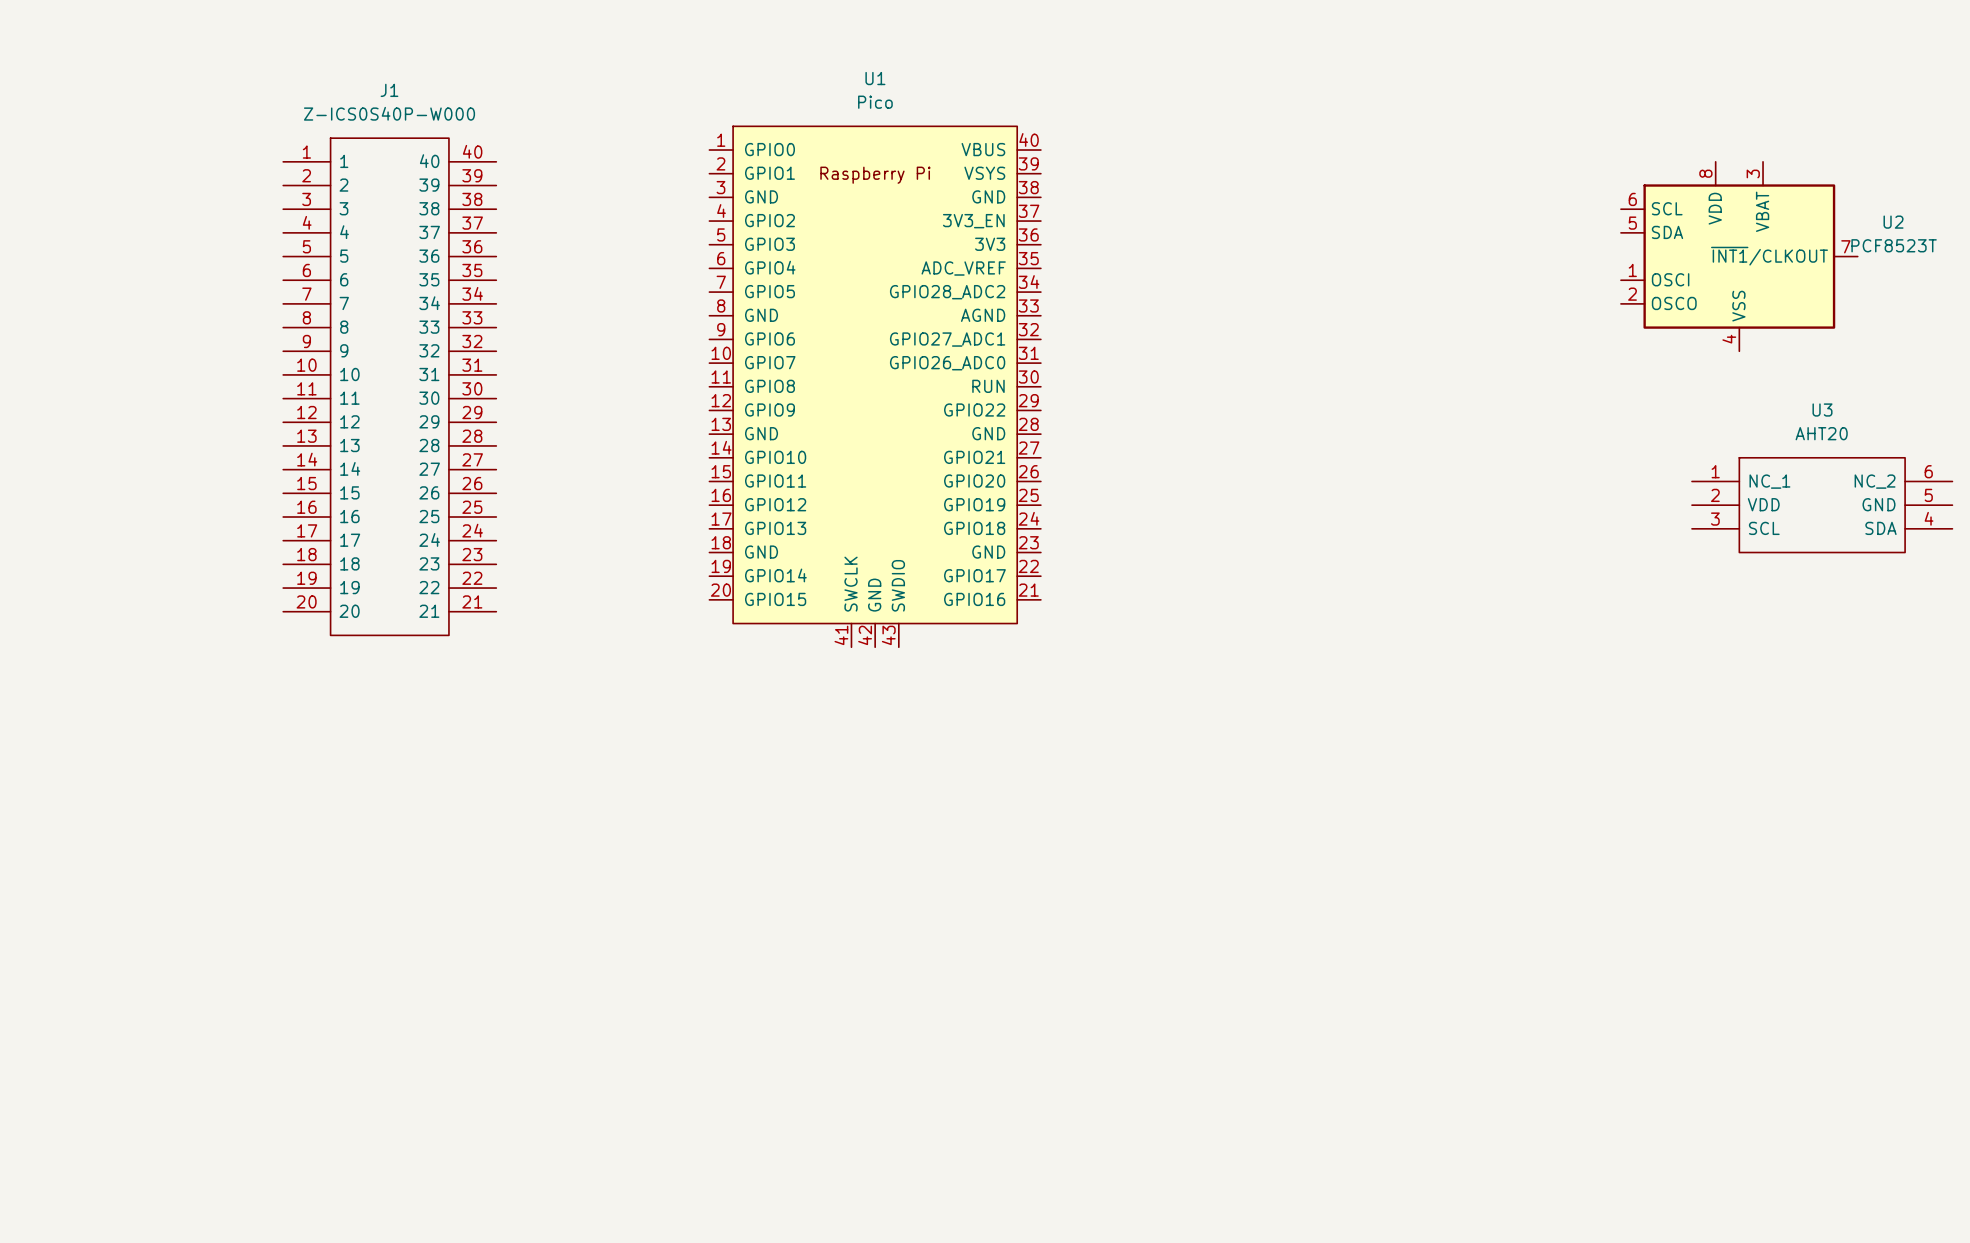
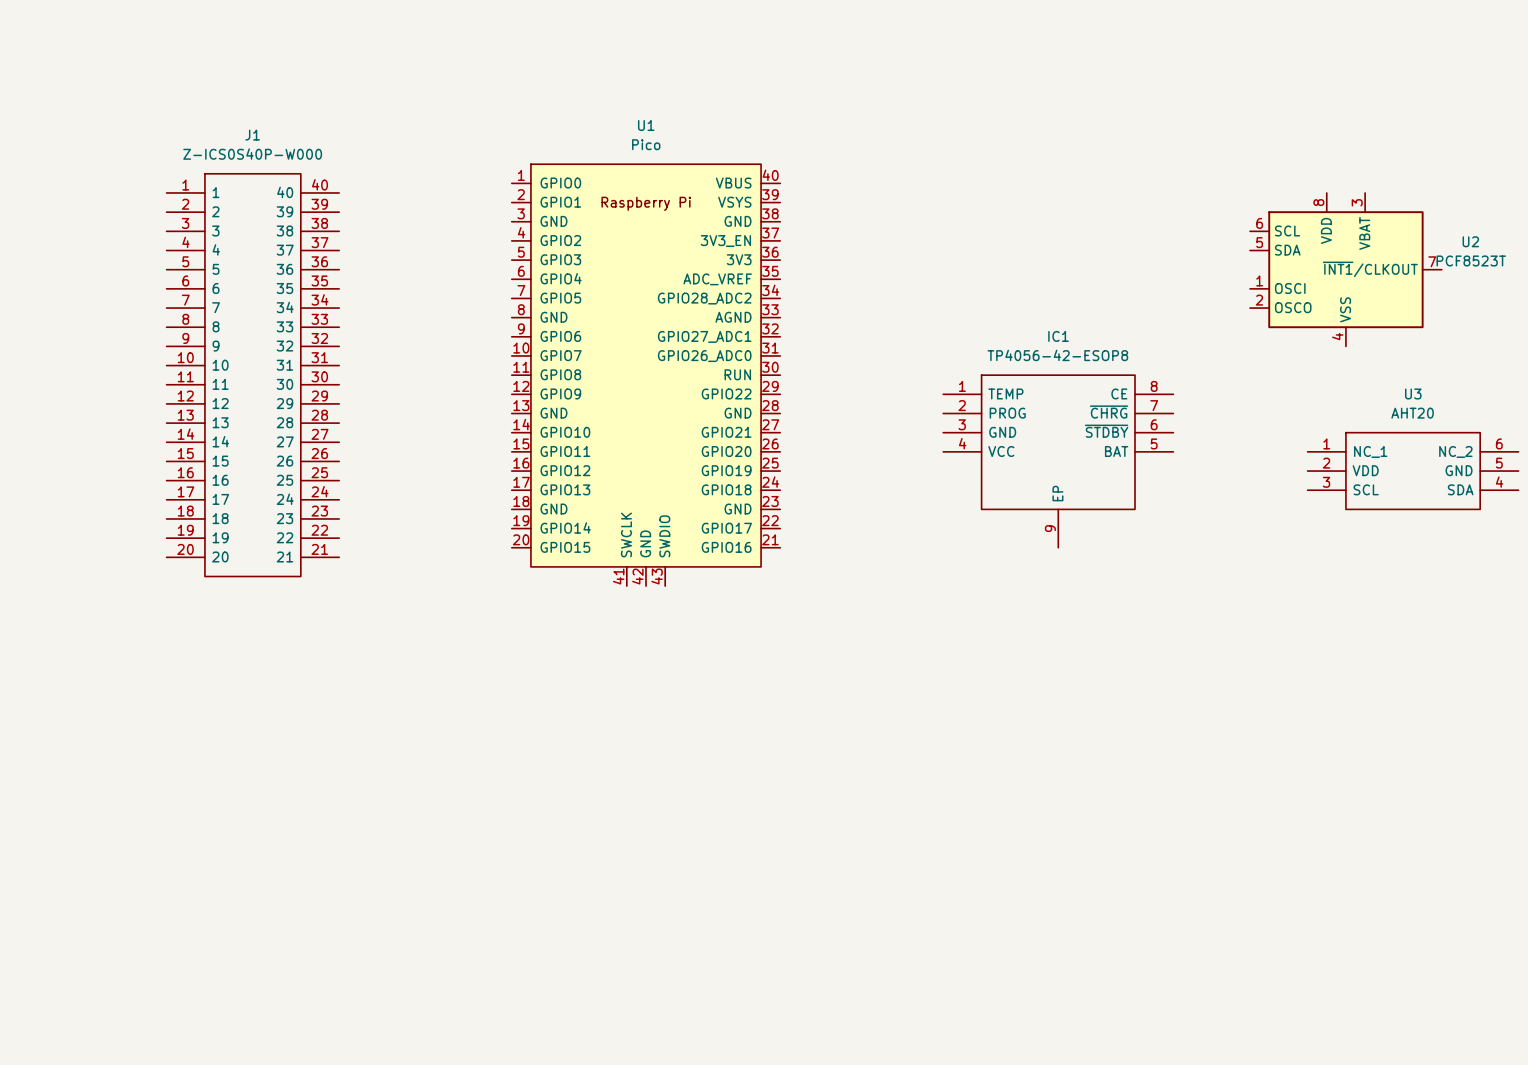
IC1: none -> TP4056-42-ESOP8 (1058, 461)

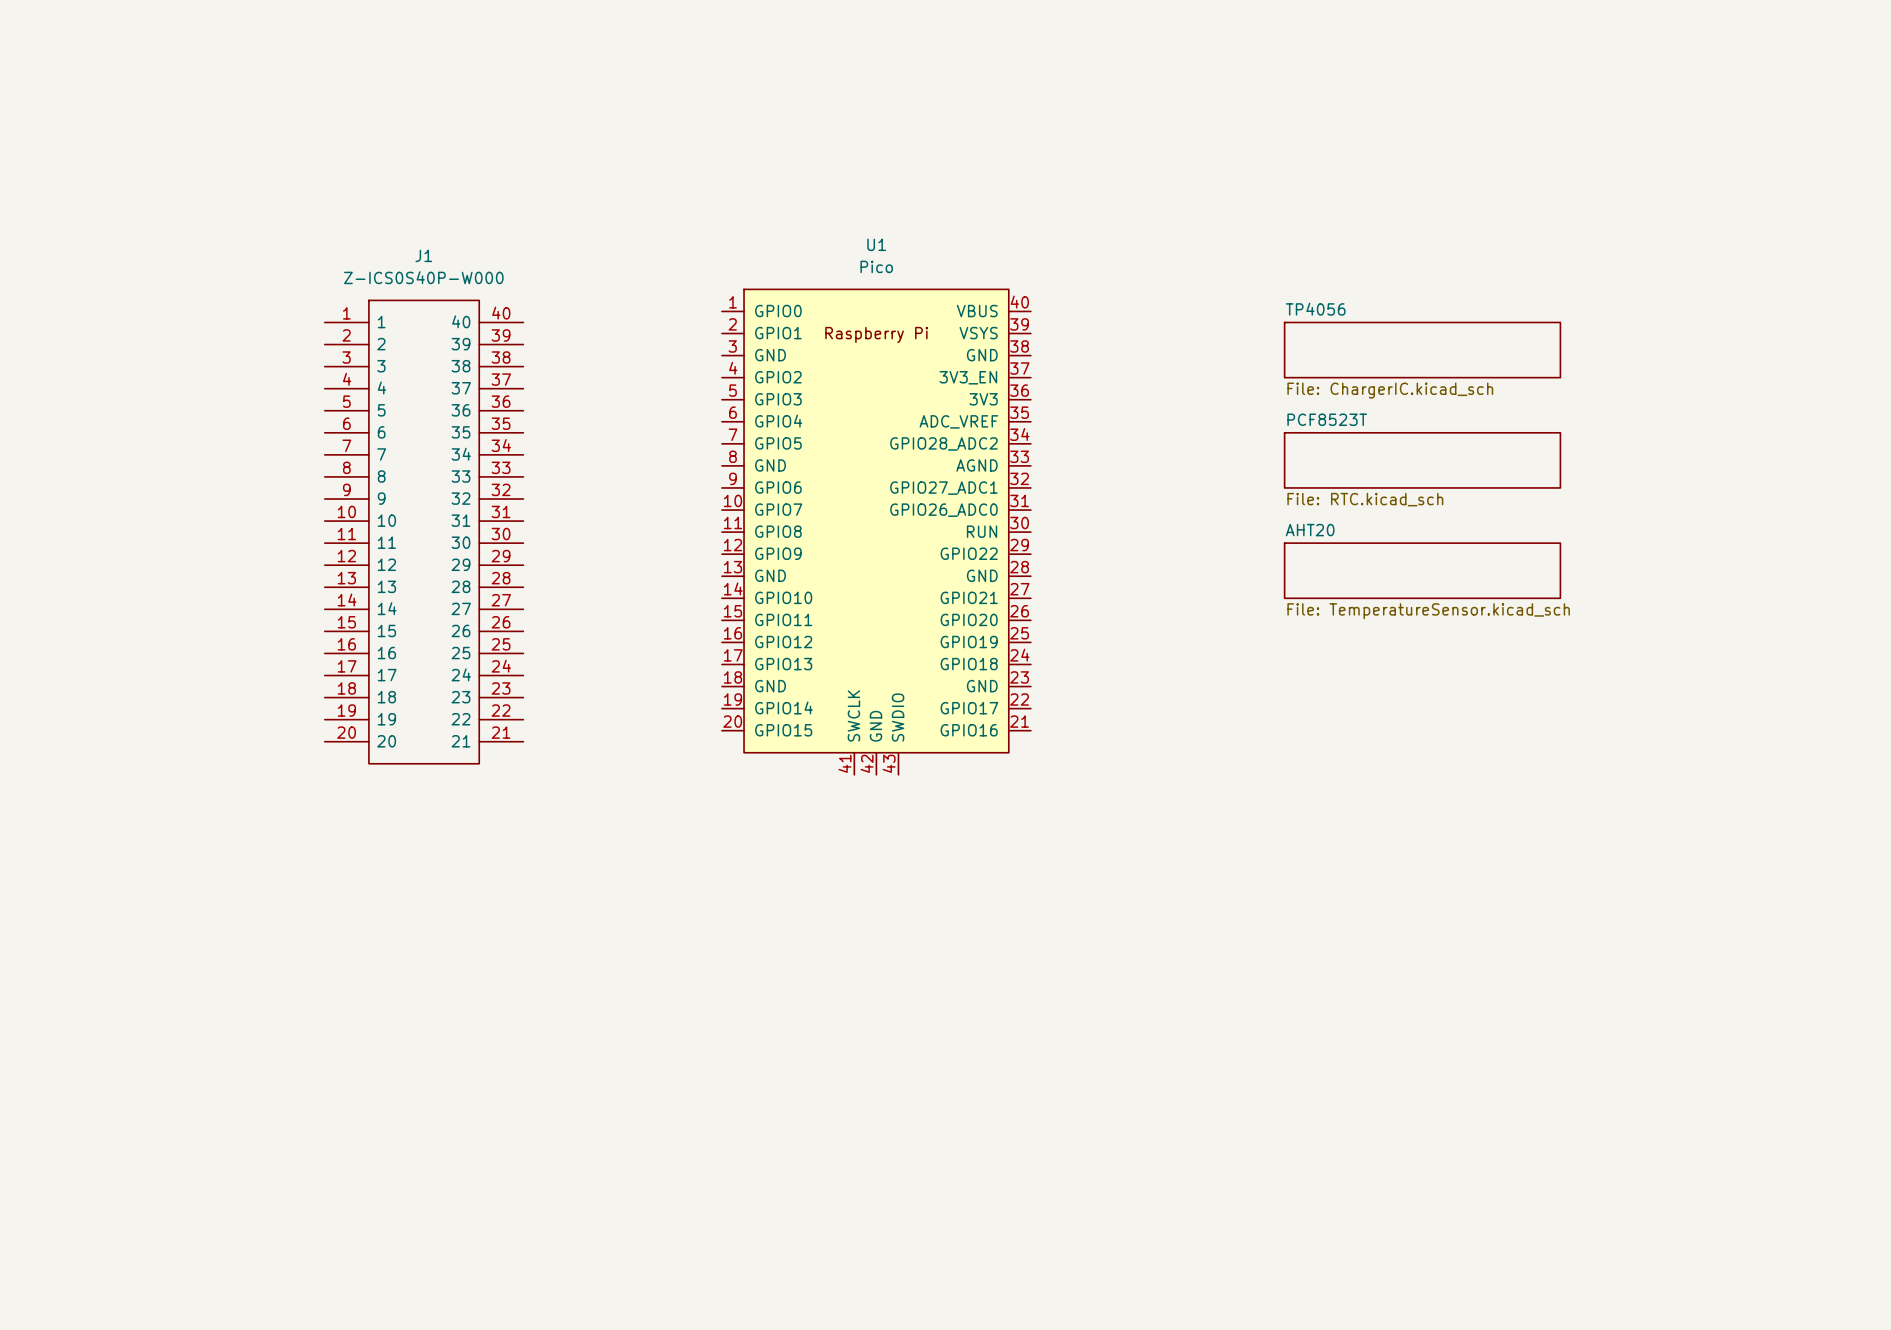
sheet TP4056: none -> File: ChargerIC.kicad_sch (1422, 350)
U2: PCF8523T (1345, 269) -> none
sheet PCF8523T: none -> File: RTC.kicad_sch (1422, 460)
sheet AHT20: none -> File: TemperatureSensor.kicad_sch (1422, 570)
IC1: TP4056-42-ESOP8 (1058, 461) -> none
U3: AHT20 (1413, 471) -> none

